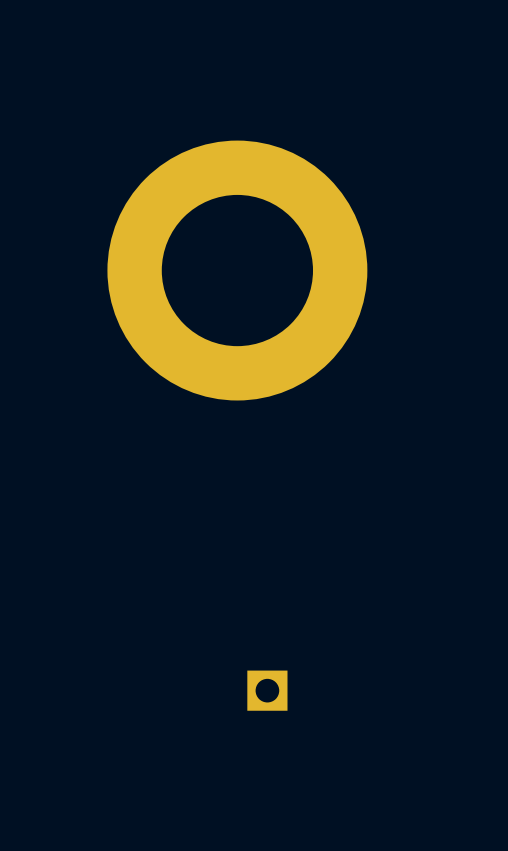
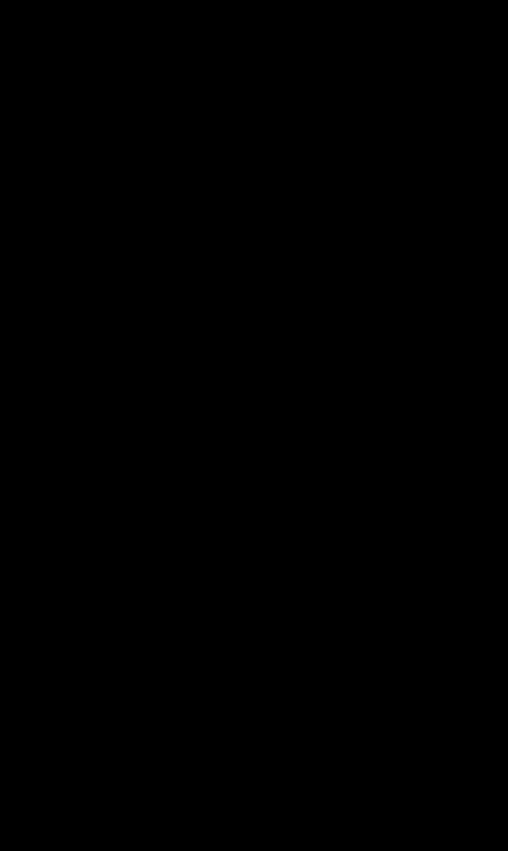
part: (237, 270) -> none
part: (267, 690) -> none

